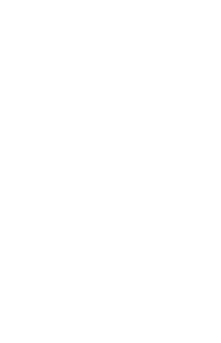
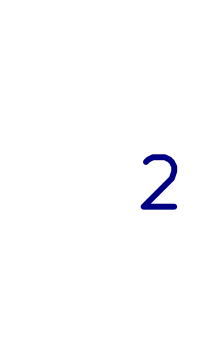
text: none -> 2 (158, 181)

